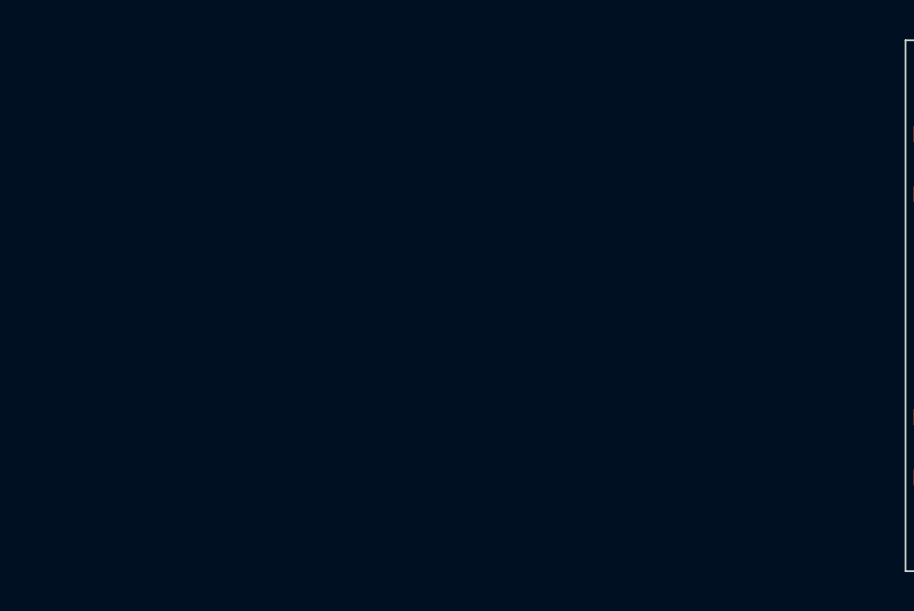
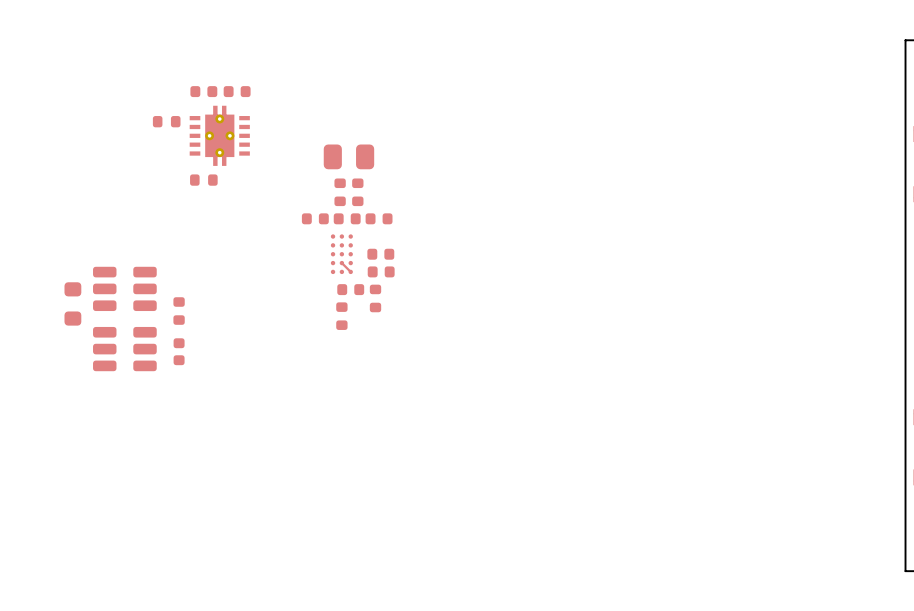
part: none -> (203, 91)
part: none -> (237, 91)
part: none -> (166, 121)
part: none -> (219, 135)
part: none -> (348, 156)
part: none -> (203, 180)
part: none -> (340, 192)
part: none -> (357, 192)
part: none -> (315, 218)
part: none -> (347, 218)
part: none -> (379, 218)
part: none -> (341, 254)
part: none -> (380, 254)
top track: none -> (341, 263) (350, 271)
part: none -> (381, 271)
part: none -> (124, 288)
part: none -> (350, 289)
part: none -> (375, 298)
part: none -> (72, 303)
part: none -> (179, 311)
part: none -> (341, 316)
part: none -> (124, 349)
part: none -> (179, 351)

